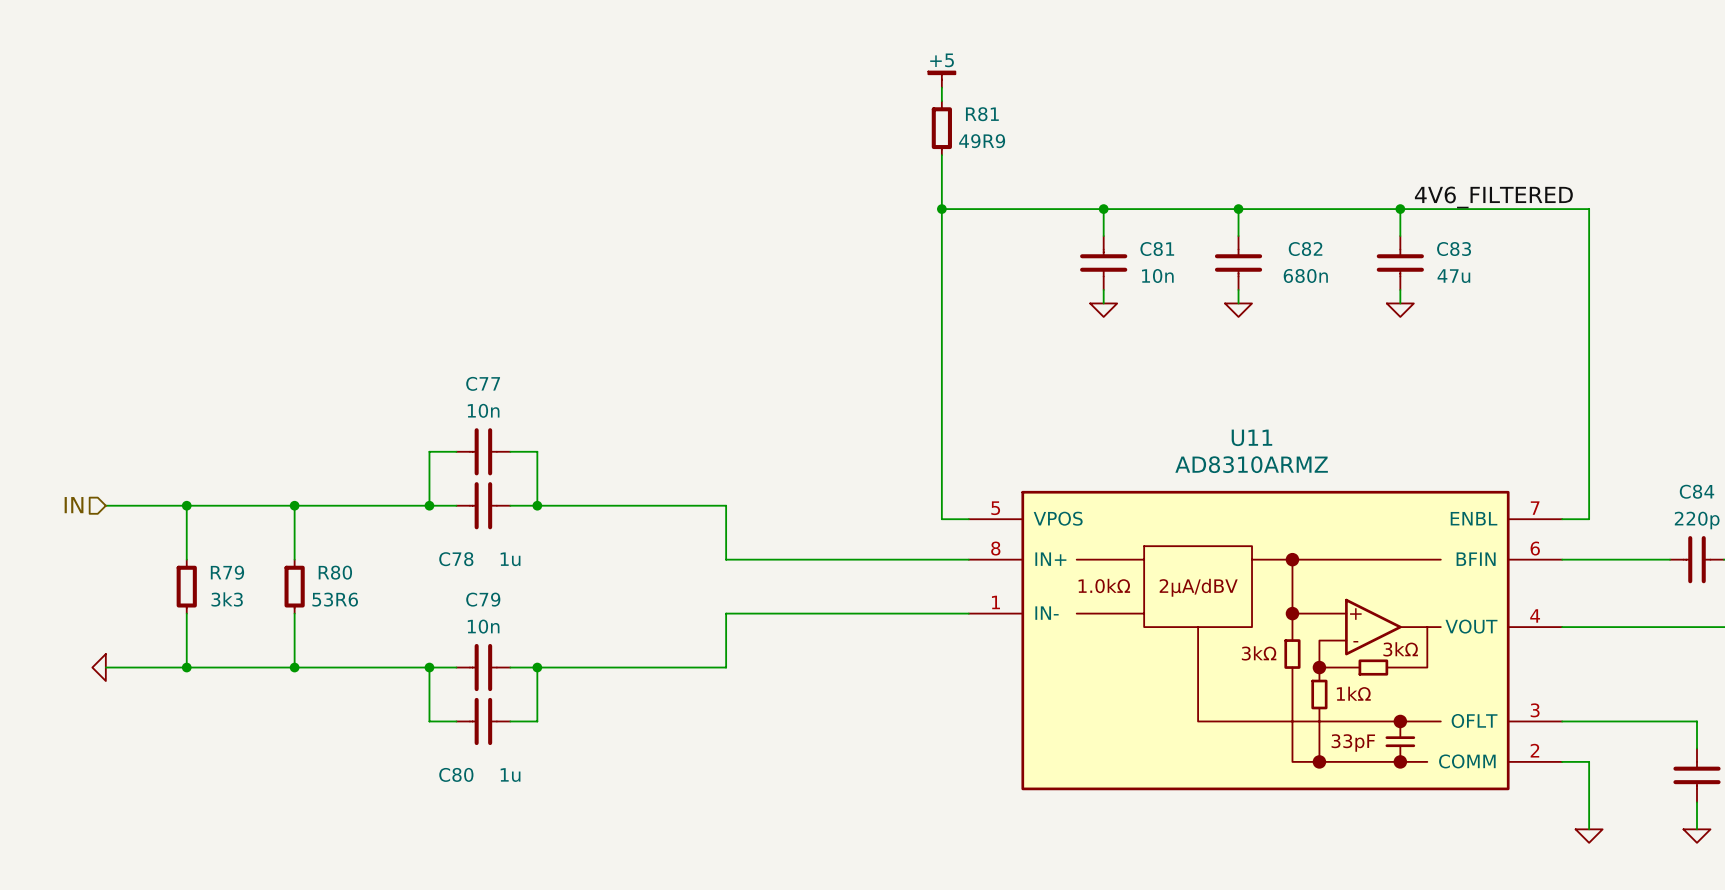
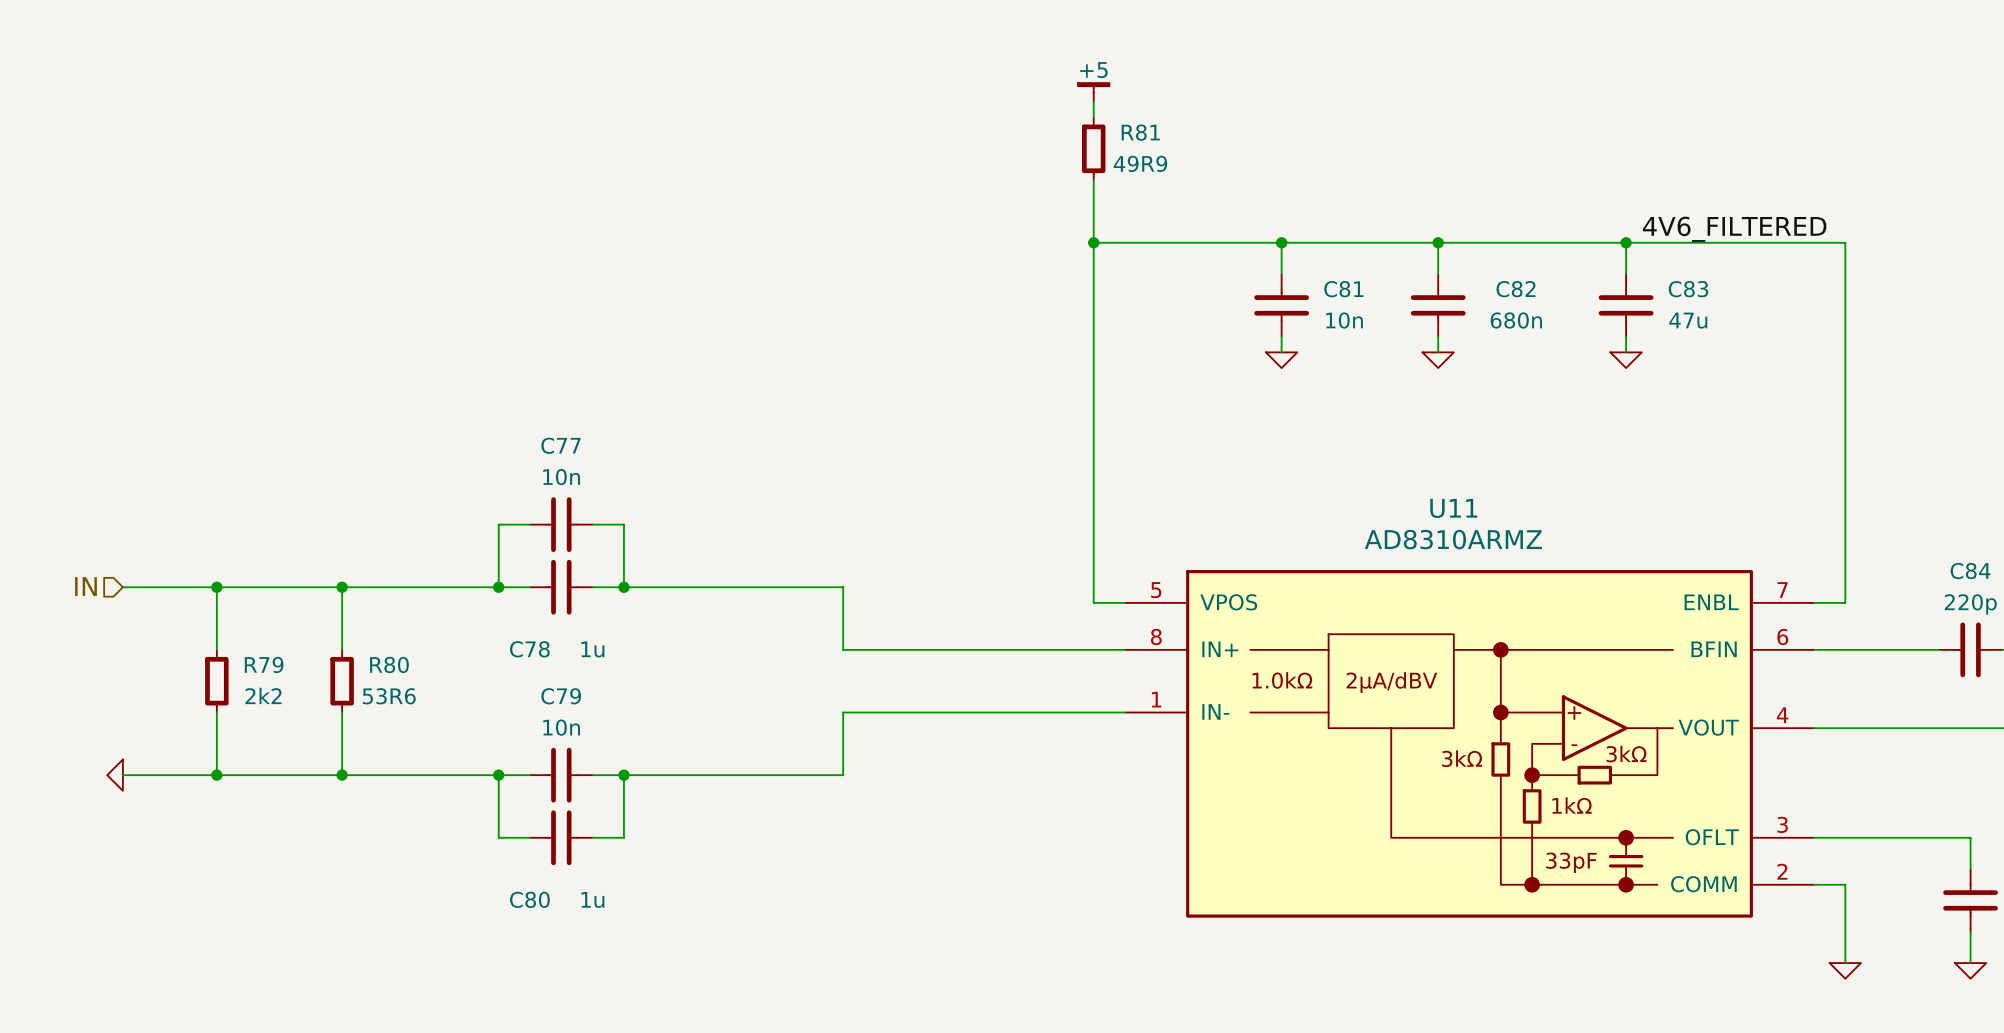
R79 value: 3k3 (227, 599) -> 2k2 (263, 695)

